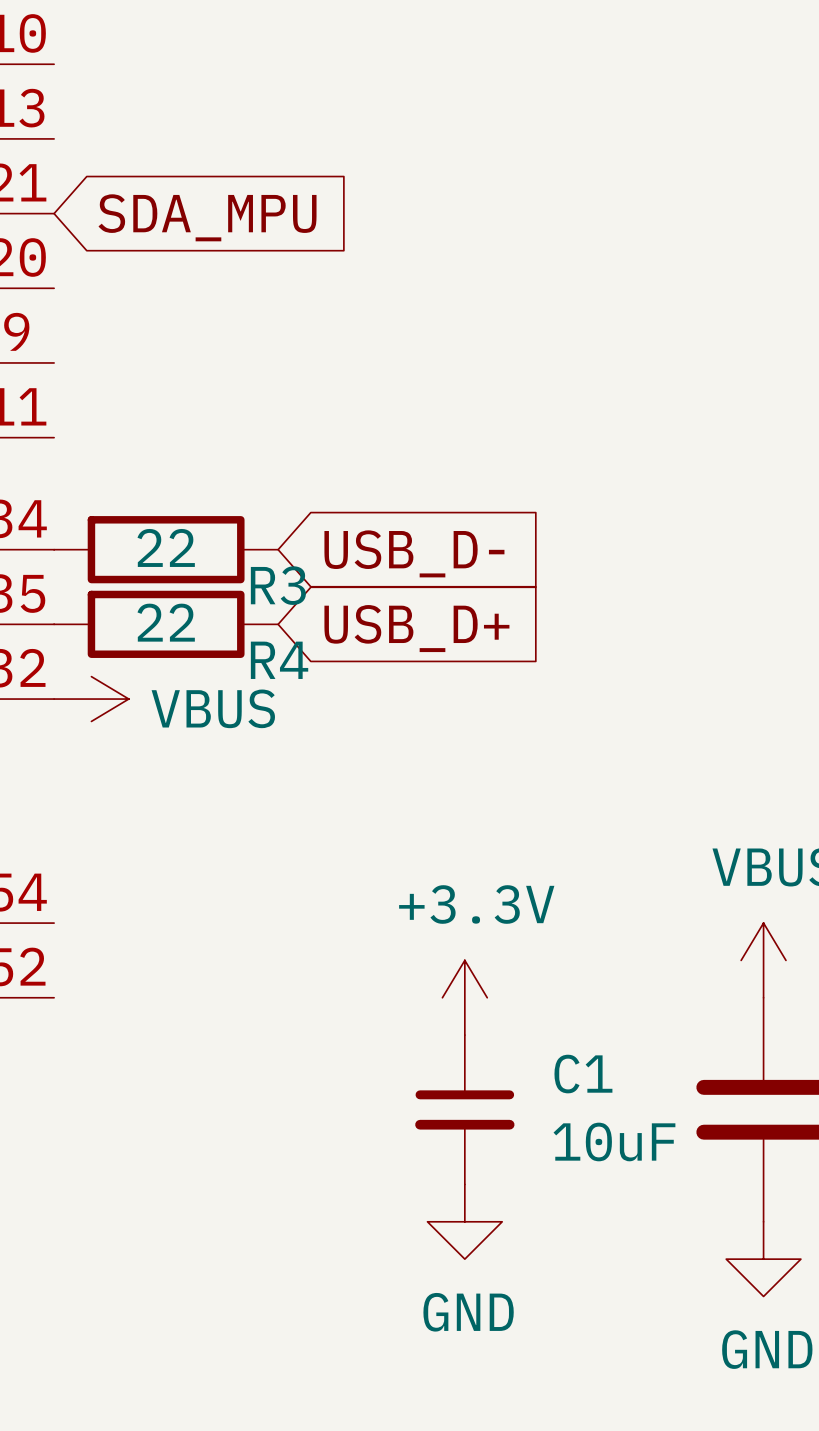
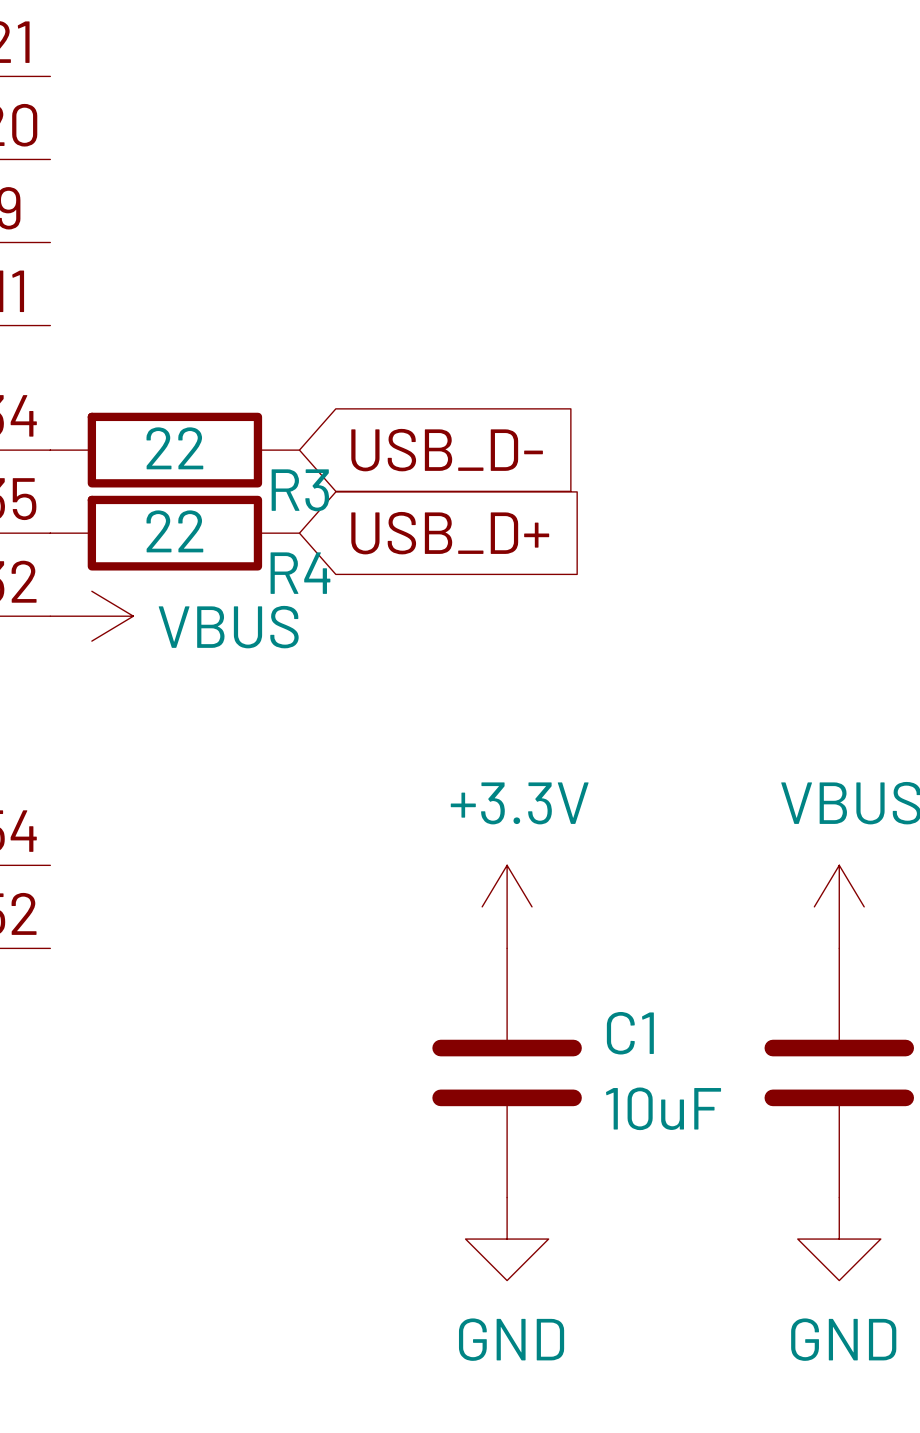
global label: SDA_MPU (207, 217) -> none
power symbol position: +3.3V (464, 997) -> +3.3V (507, 906)
C1 symbol: [415, 1035, 515, 1185] -> [432, 948, 582, 1198]
power symbol position: GND (464, 1221) -> GND (507, 1239)

